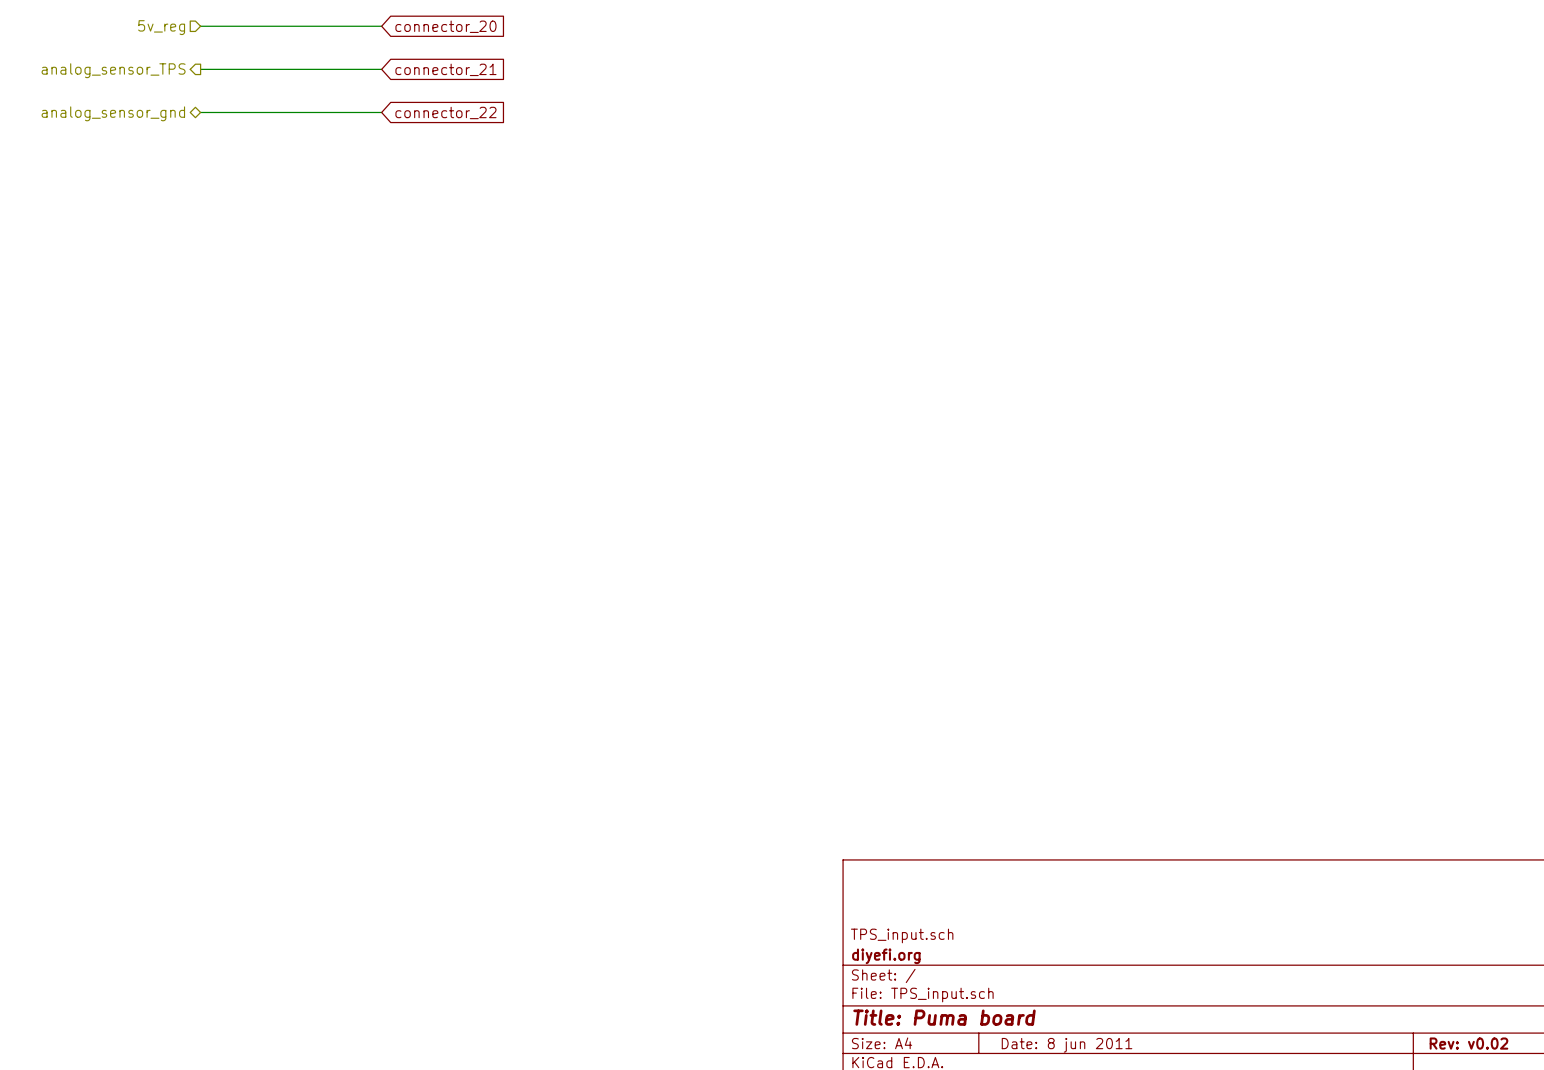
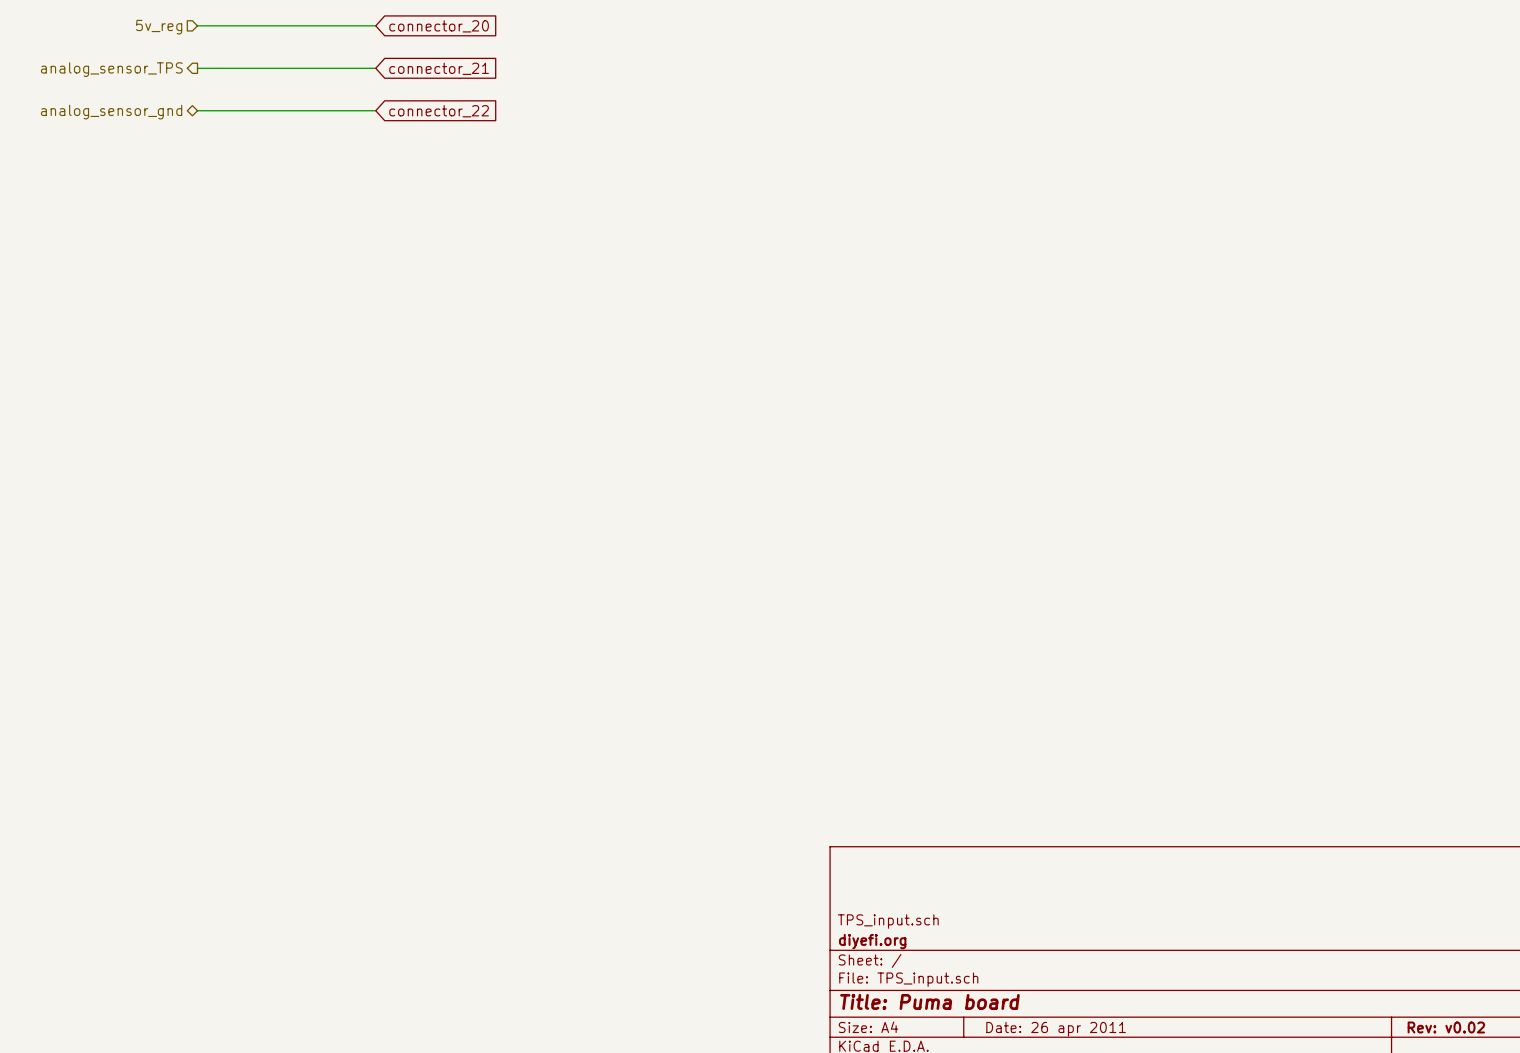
title block: Date: 8 jun 2011 (1067, 1045) -> Date: 26 apr 2011 (1056, 1029)

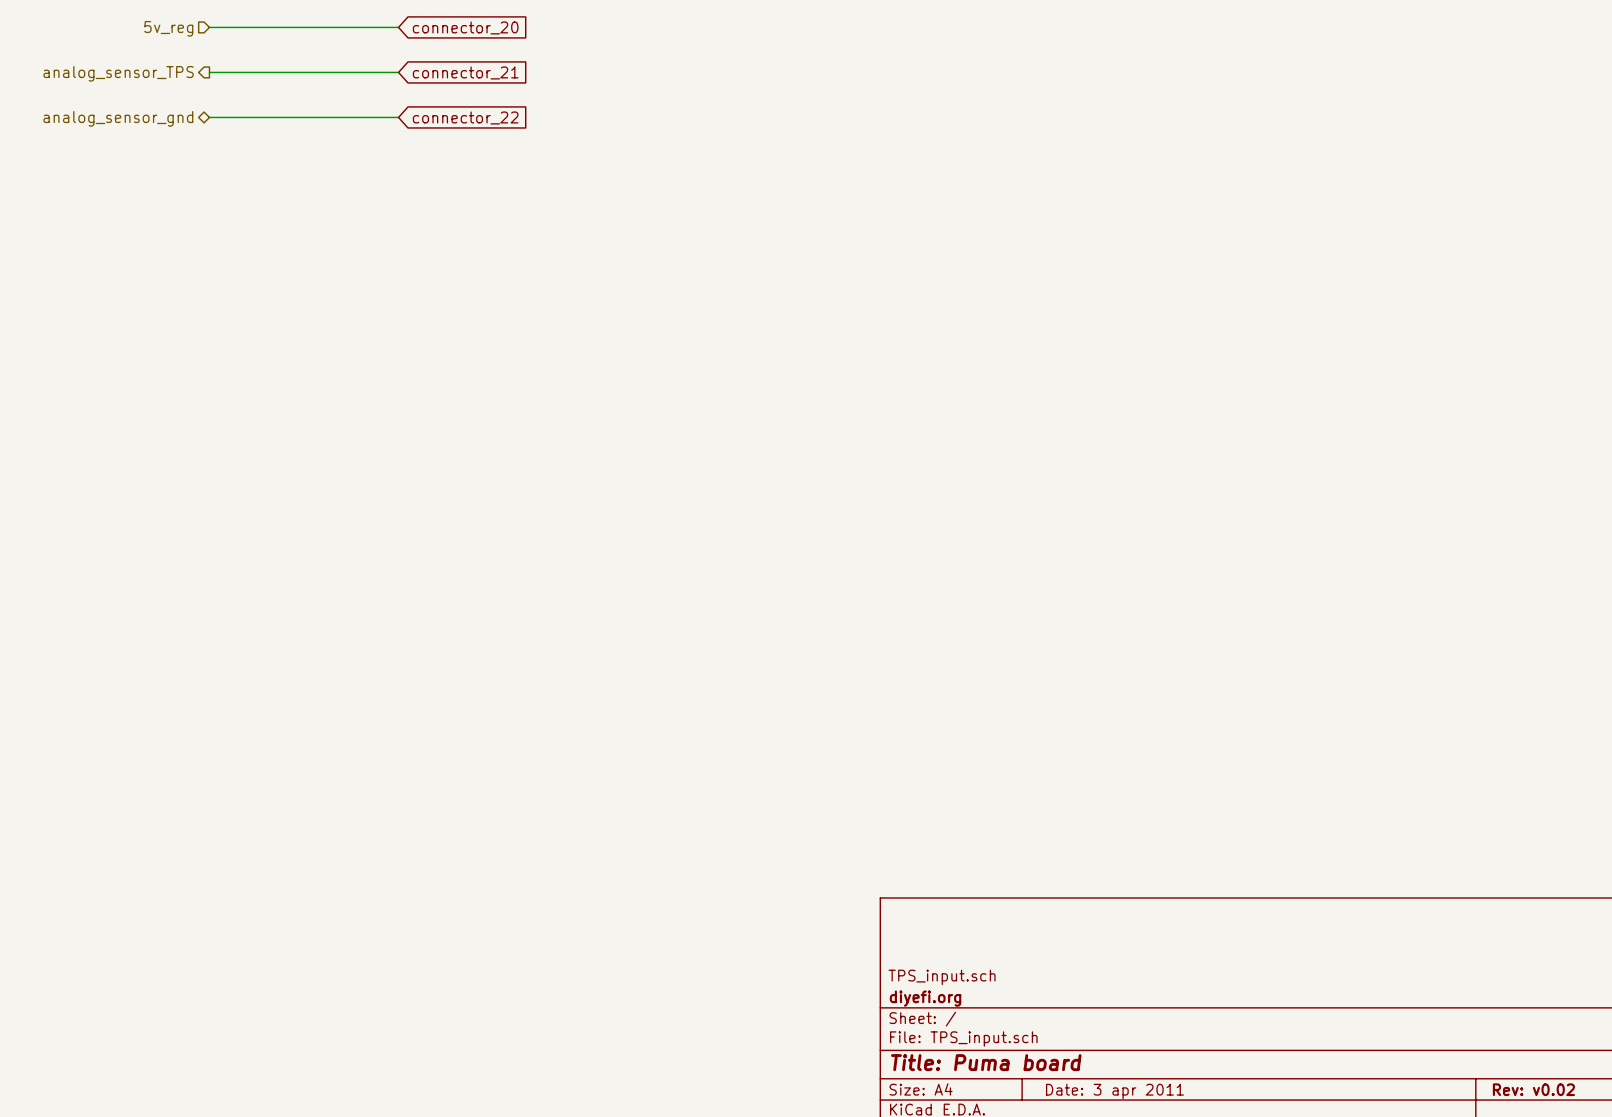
title block: Date: 26 apr 2011 (1056, 1029) -> Date: 3 apr 2011 (1114, 1091)

